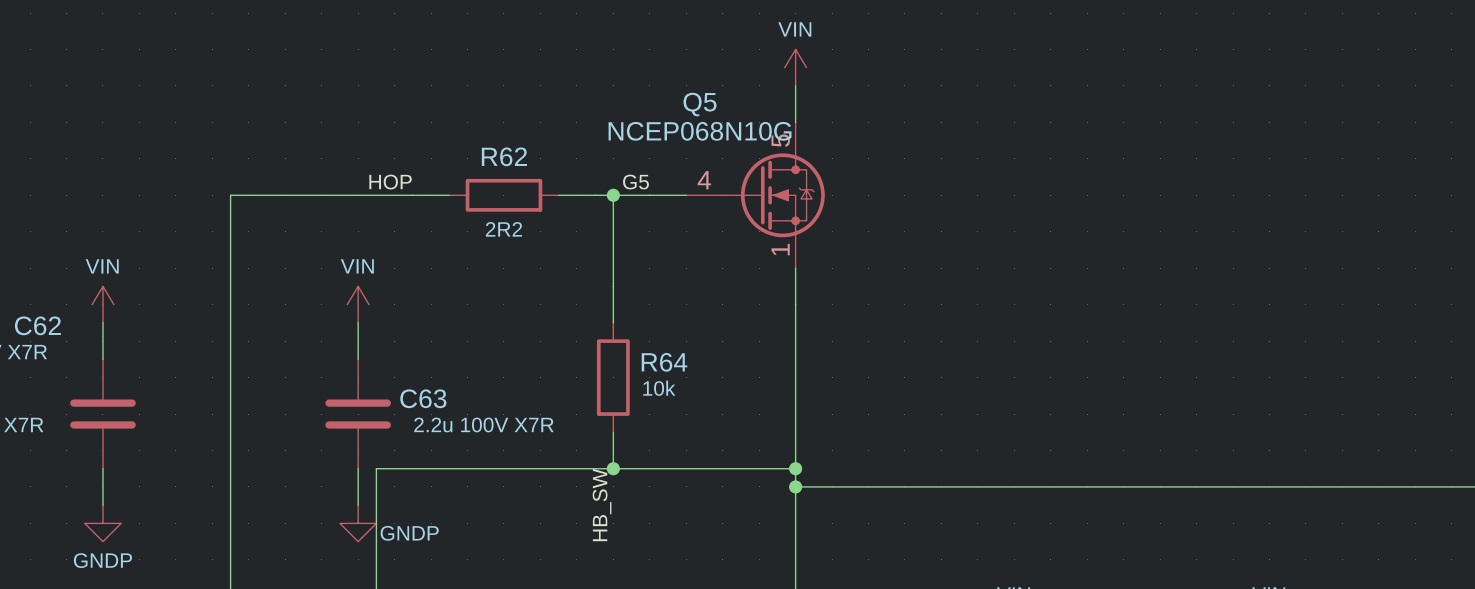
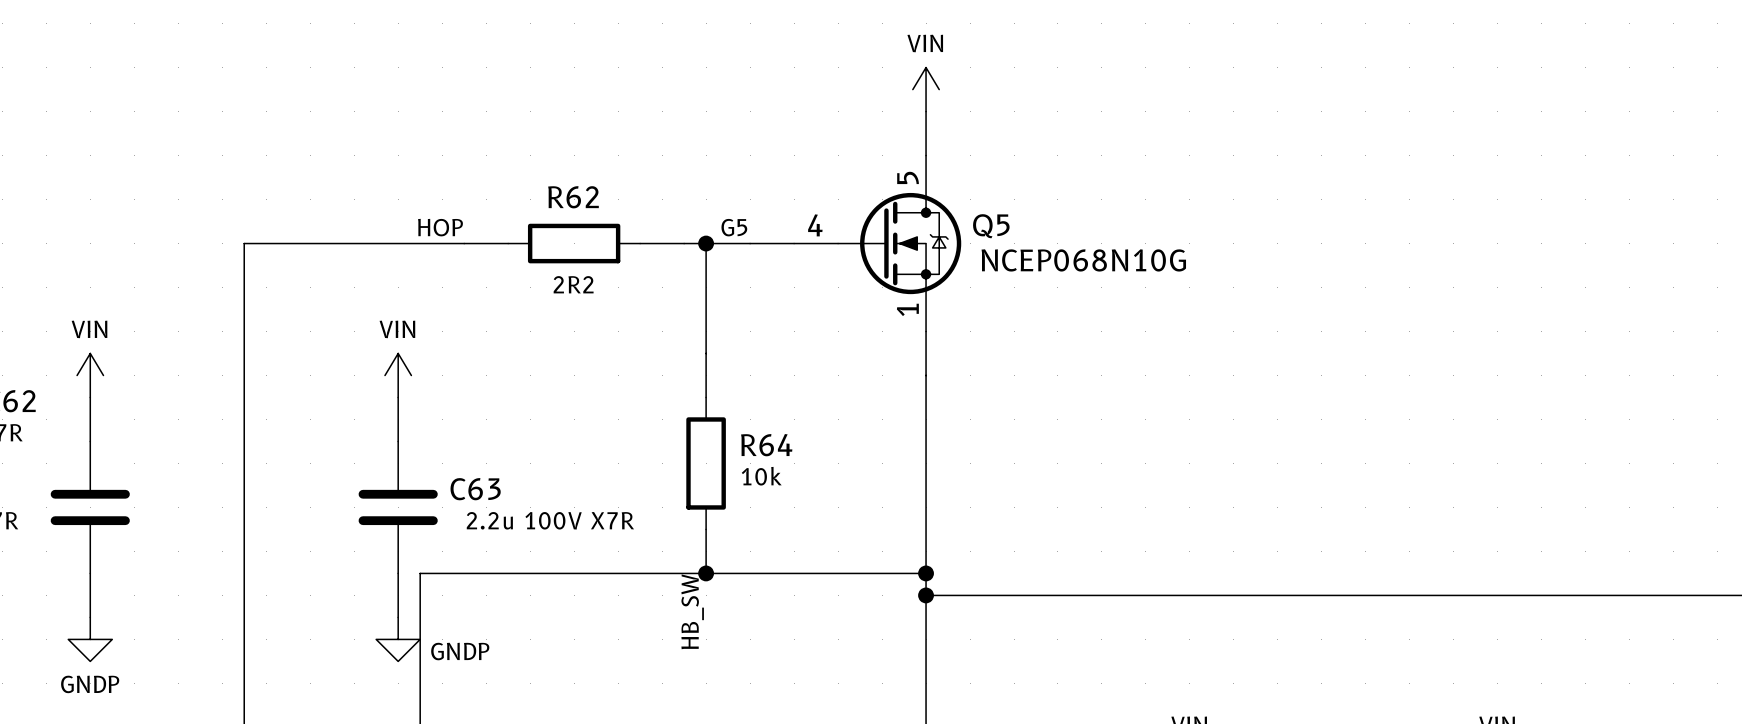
Q5 name position: Q5 (699, 104) -> Q5 (991, 226)
Q5 value position: NCEP068N10G (700, 131) -> NCEP068N10G (1083, 260)

